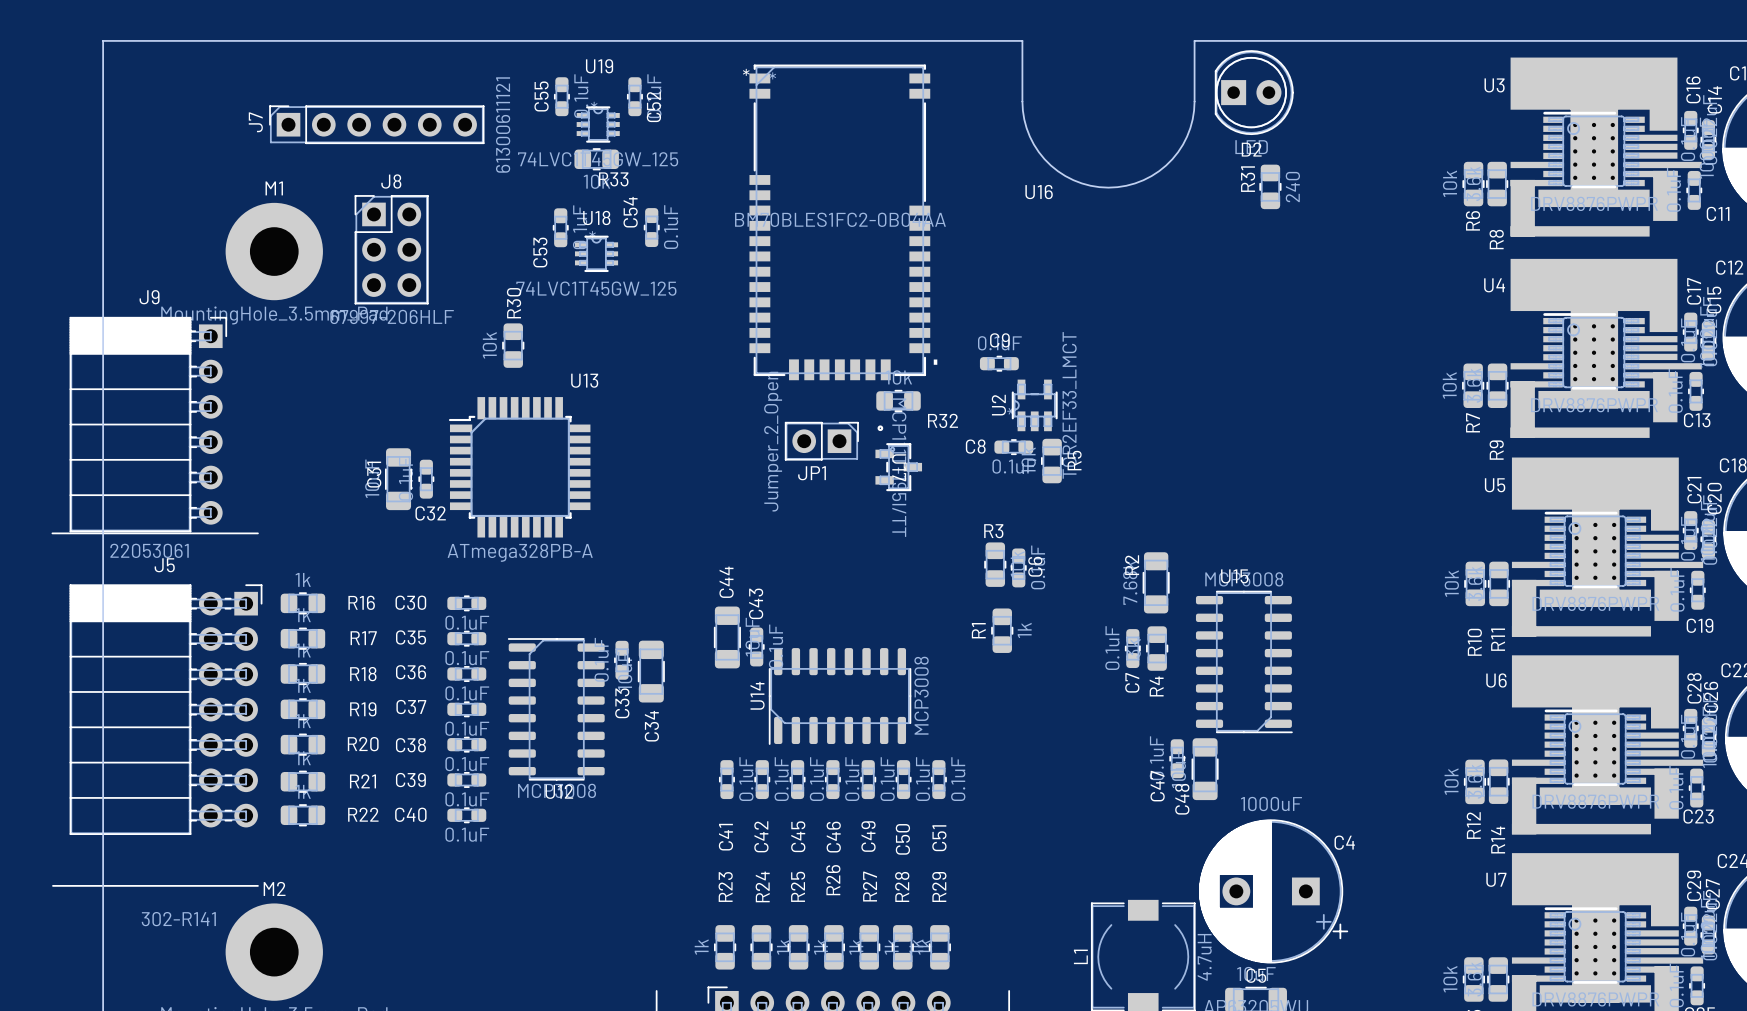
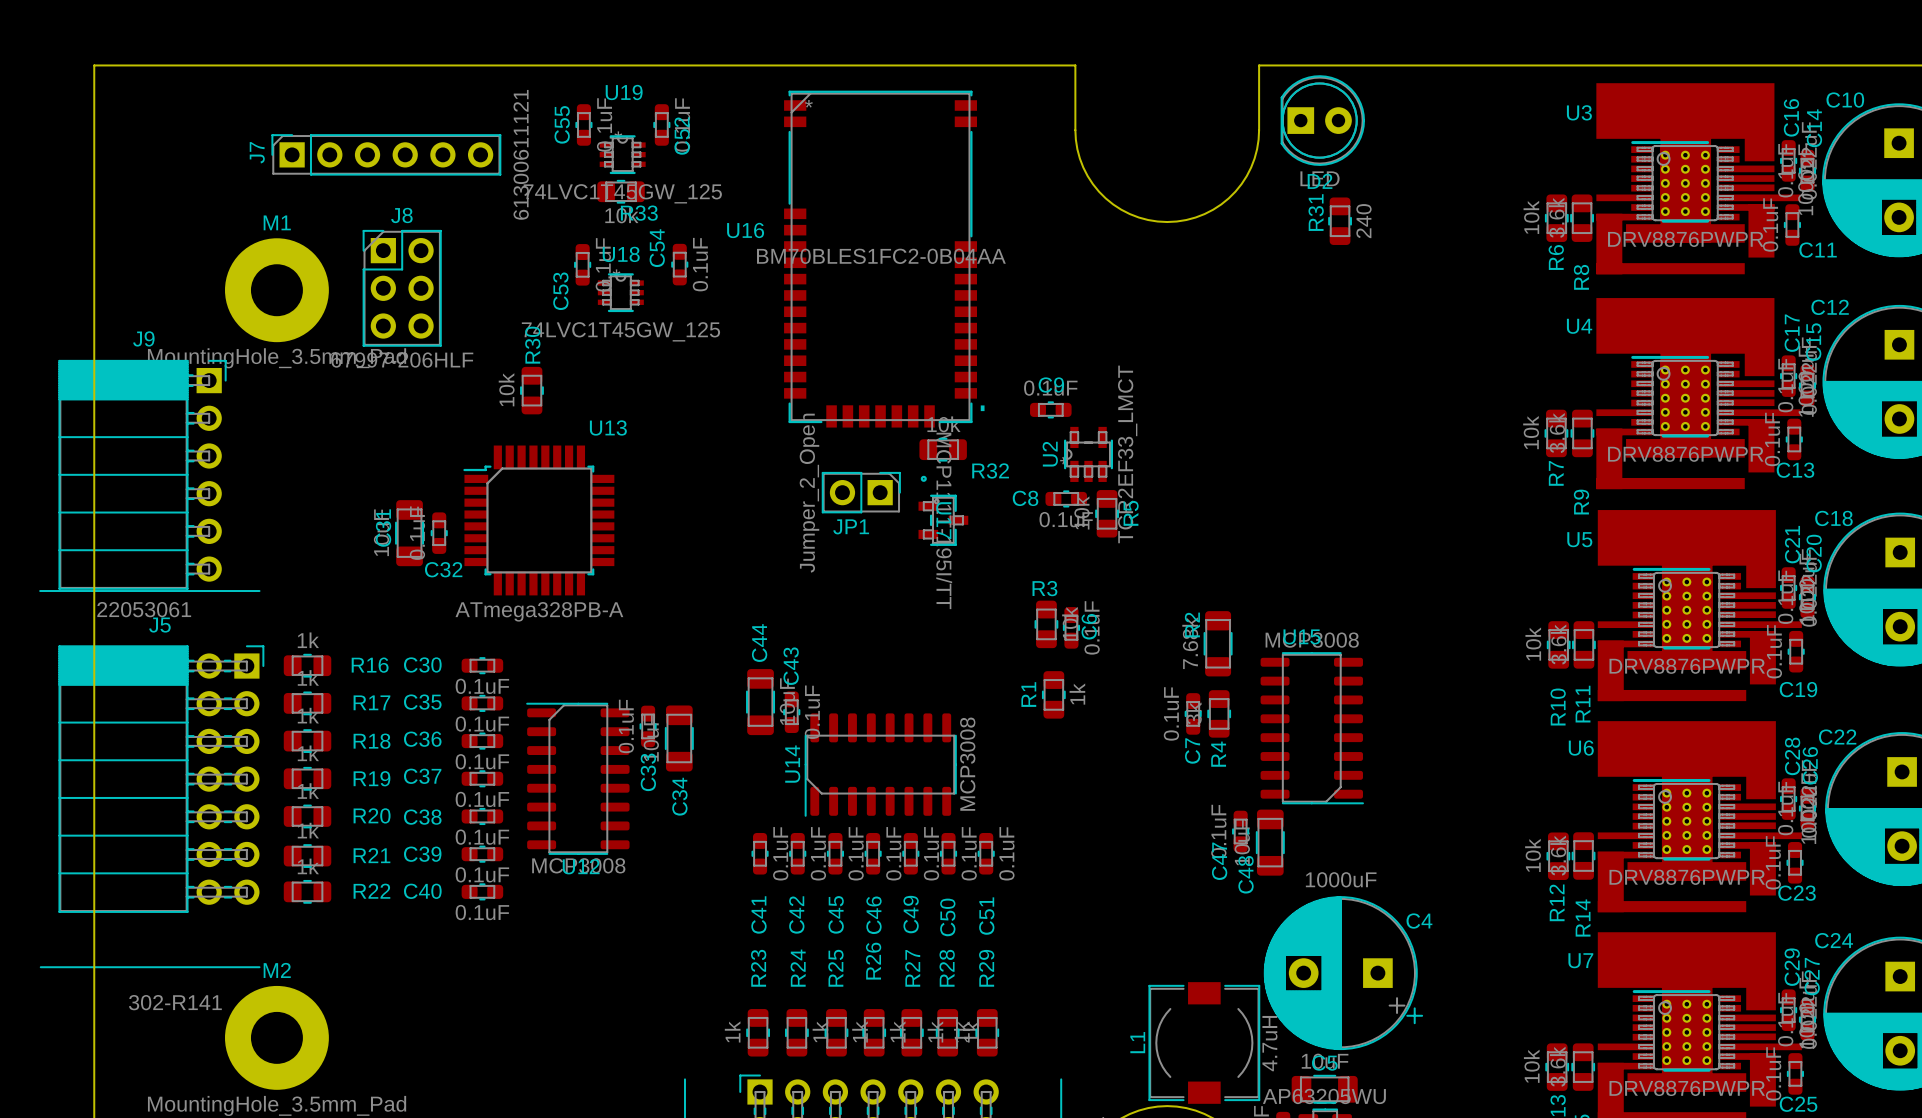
U16 text: * (746, 72) -> none
U16 name position: U16 (1039, 192) -> U16 (745, 230)

